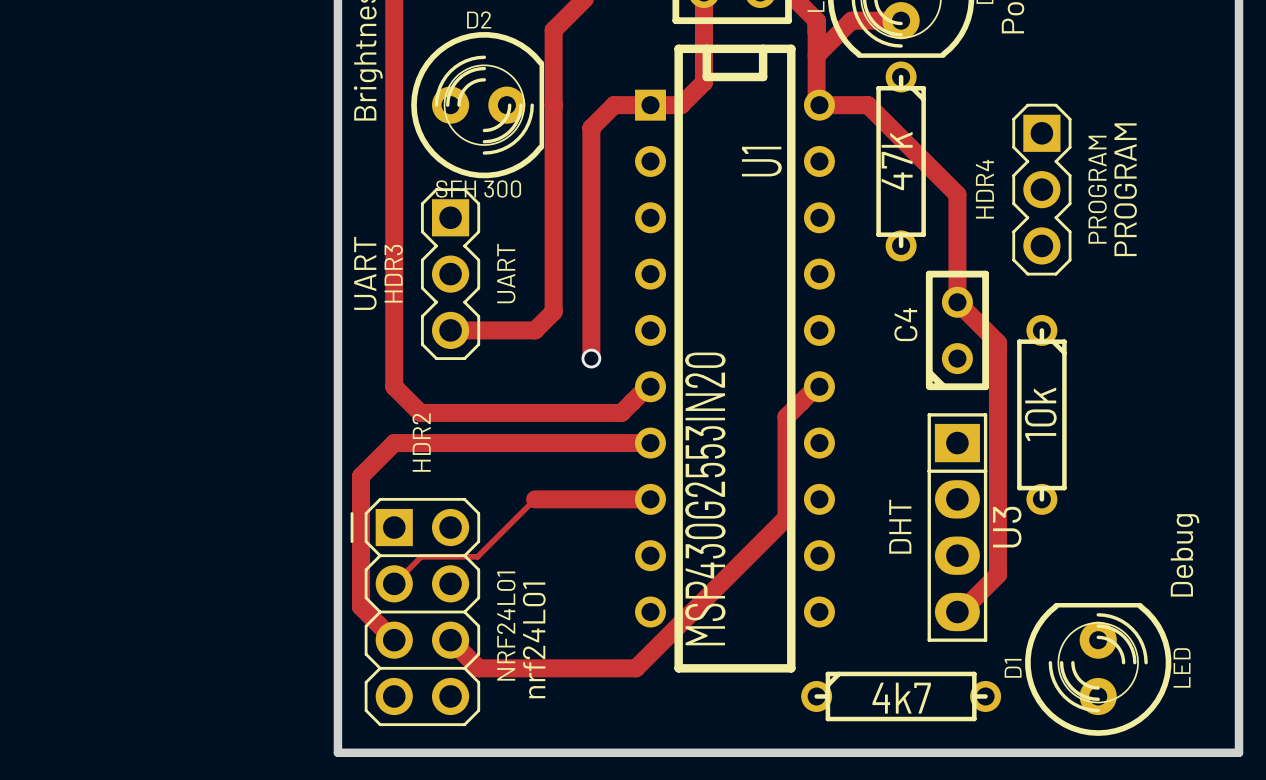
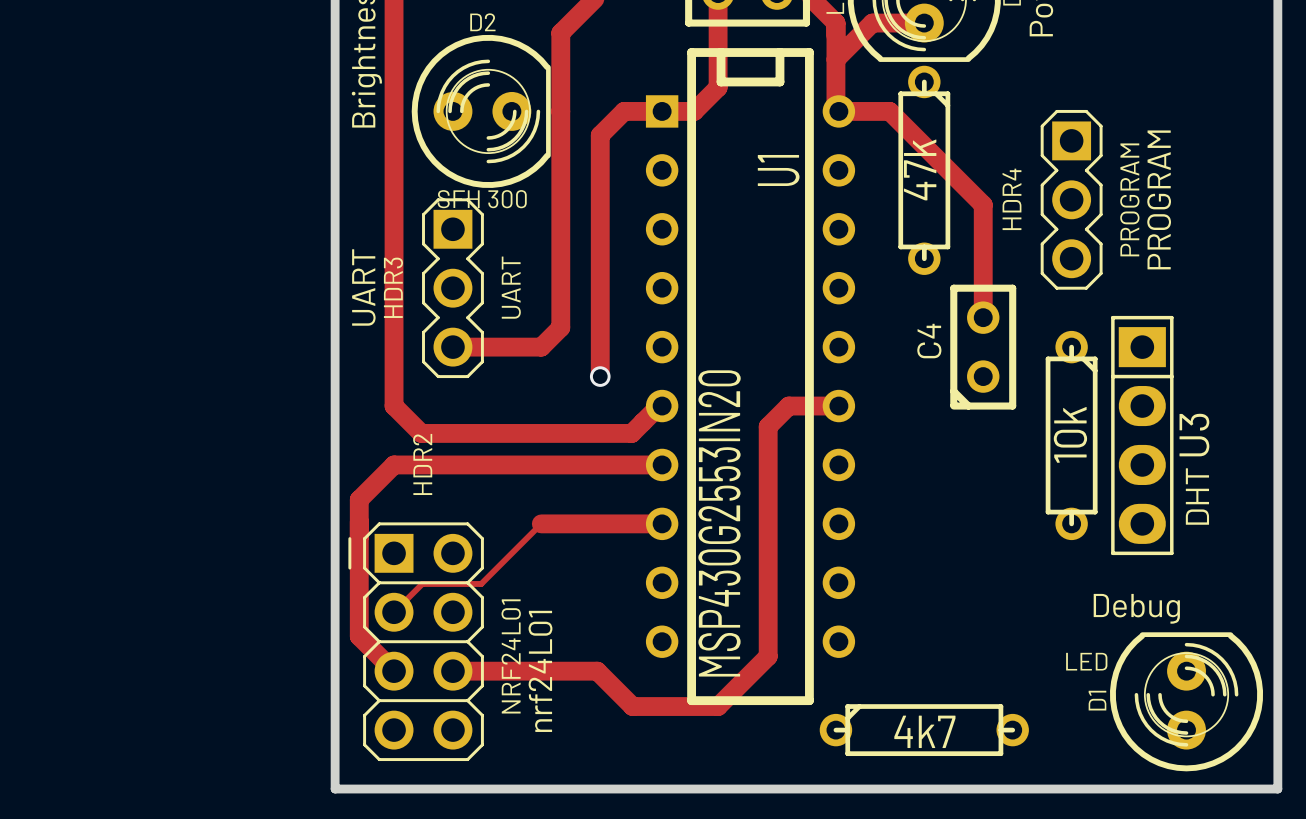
track: (957, 302) (997, 342) (997, 574) (960, 612) (957, 612) -> none
track: (816, 386) (786, 416) (786, 517) (635, 668) (478, 668) (450, 640) -> (838, 406) (788, 406) (768, 426) (768, 656) (718, 706) (632, 706) (597, 671) (452, 671)
text position: DHT (900, 526) -> DHT (1197, 496)
U3 position: (957, 527) -> (1142, 435)
text rotation: 0° (1185, 555) -> 90° clockwise (1136, 608)
D1 value rotation: 0° (1182, 667) -> 90° clockwise (1086, 661)
D1 value position: LED (1182, 667) -> LED (1086, 661)
D1 position: (1098, 669) -> (1186, 701)

